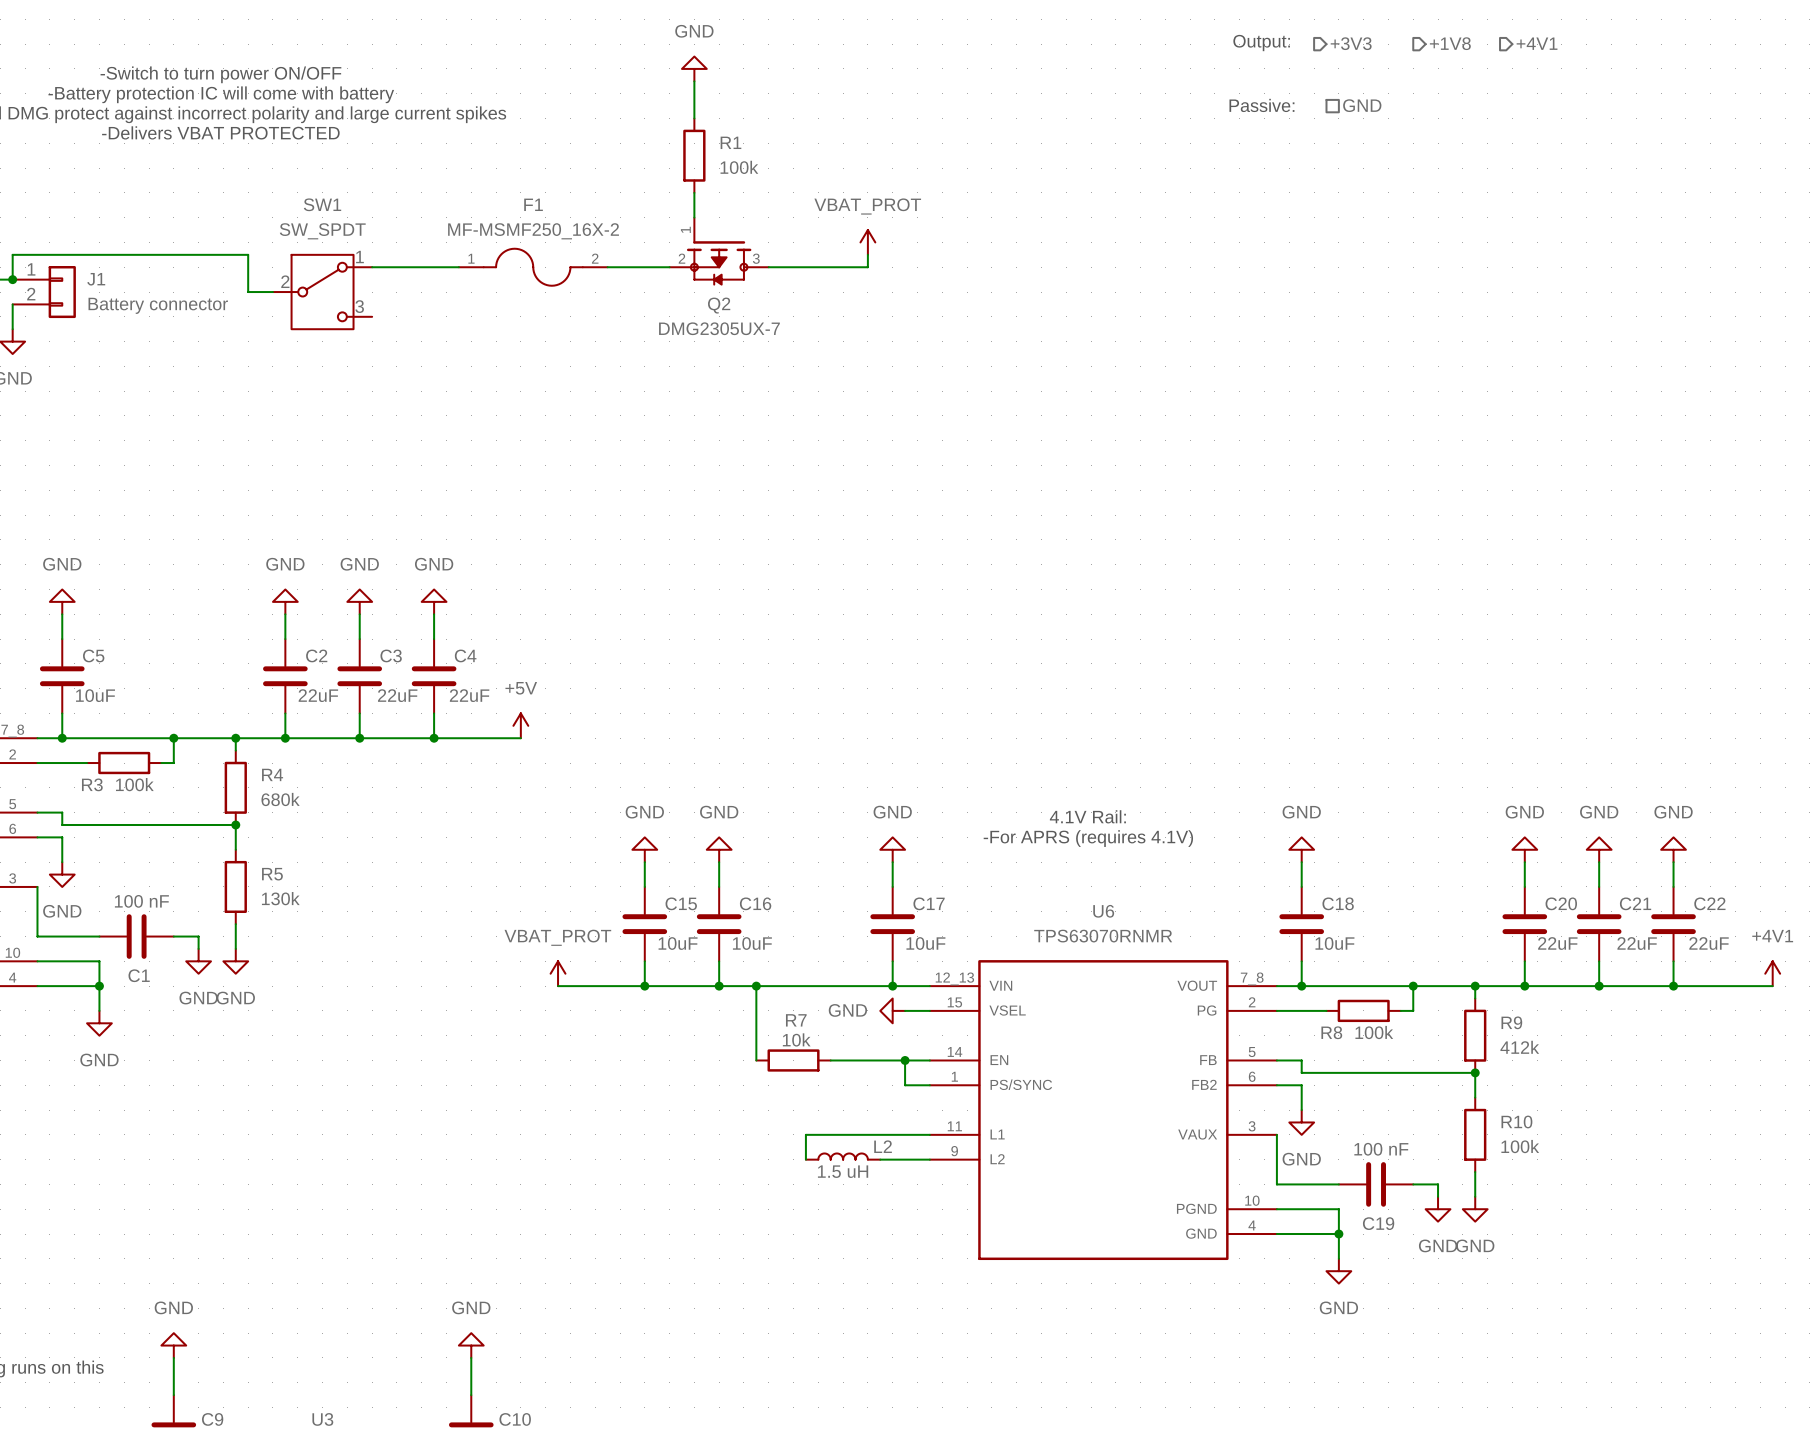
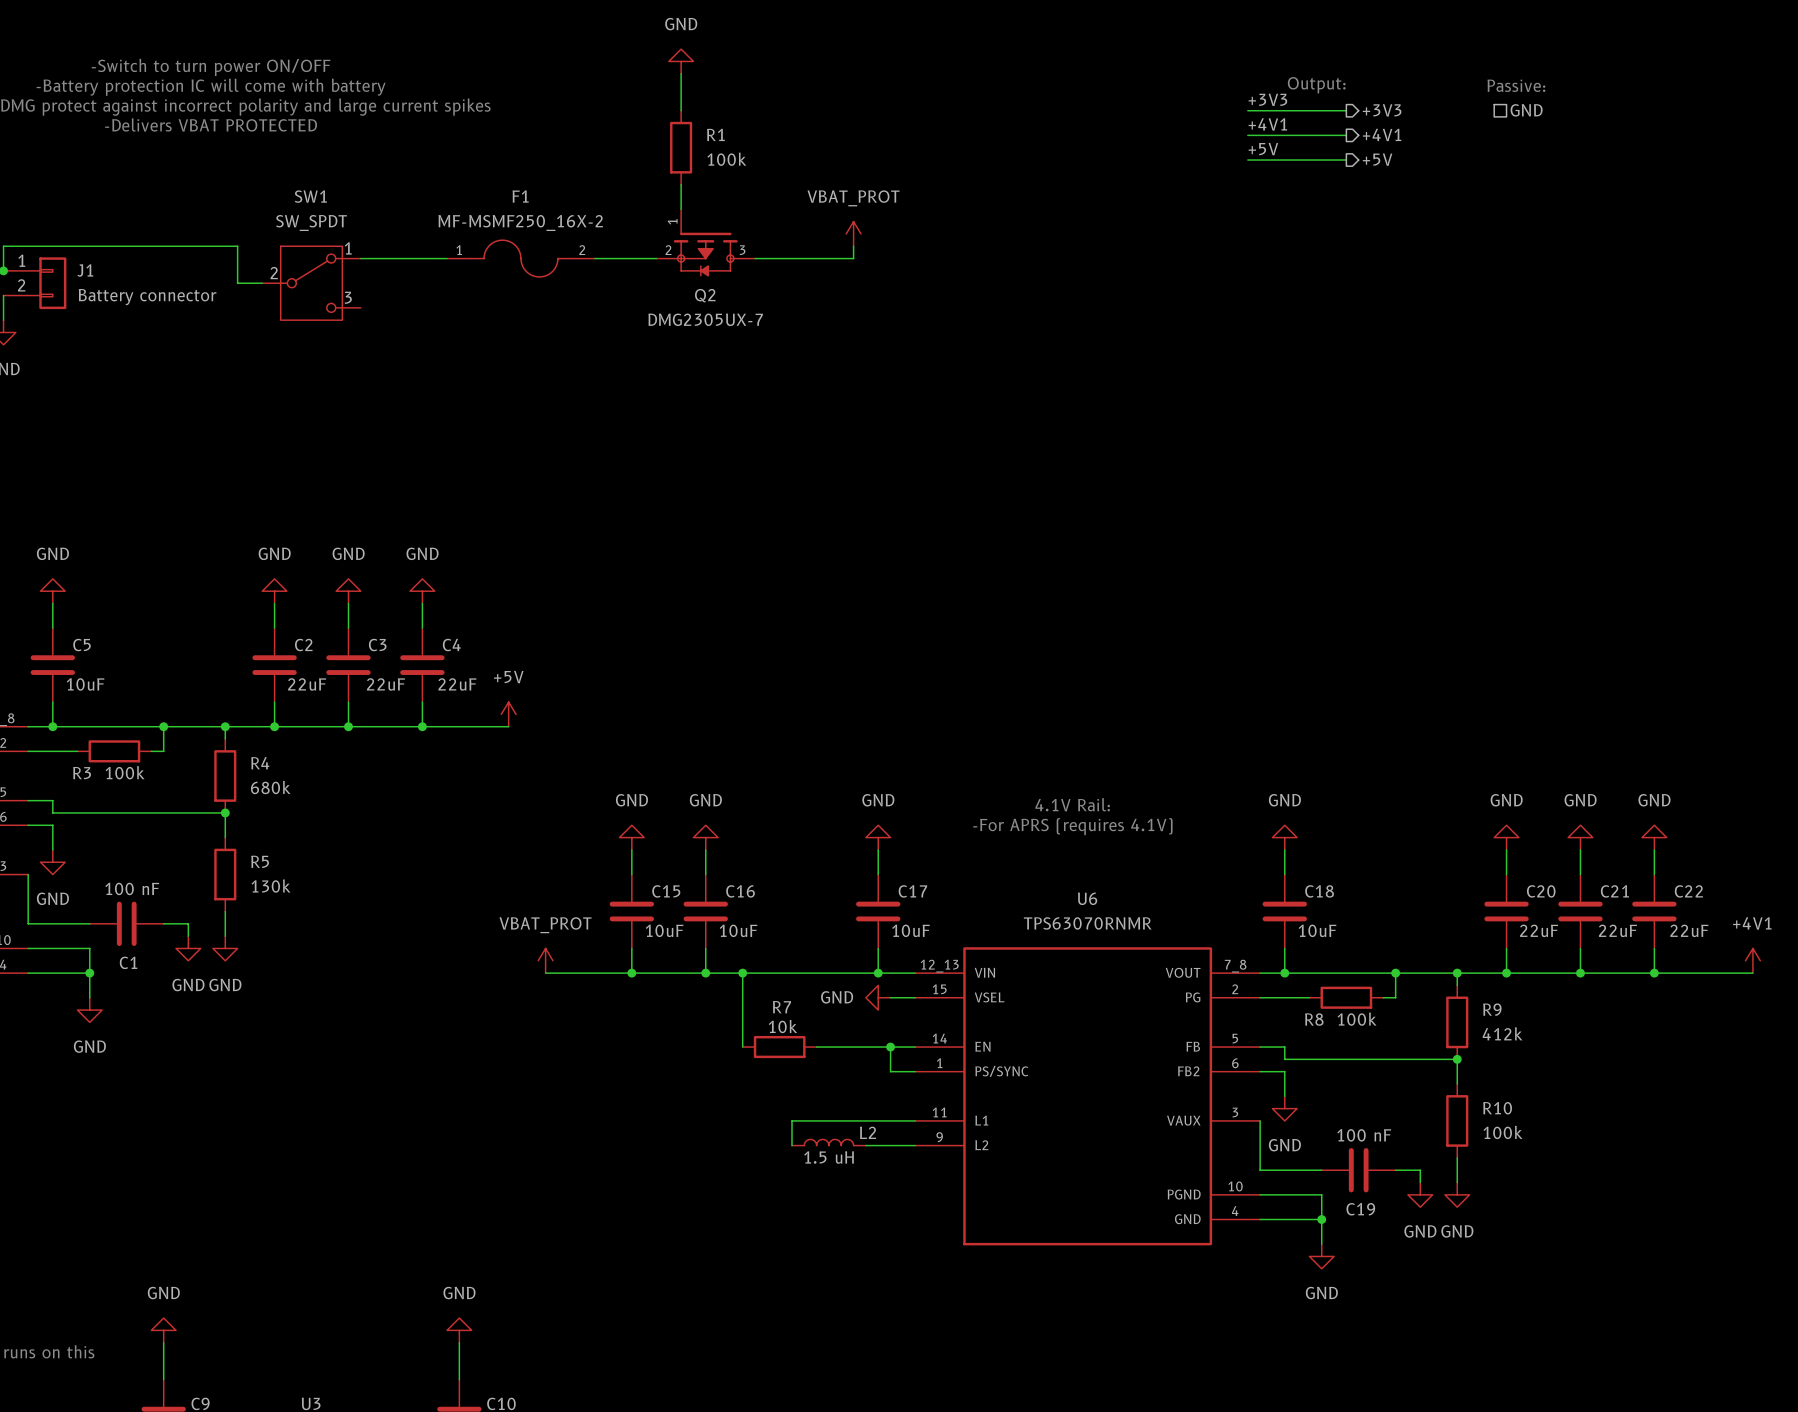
text position: Output: (1261, 43) -> Output: (1316, 85)
hierarchical label position: +3V3 (1351, 43) -> +3V3 (1382, 110)
hierarchical label: +1V8 (1450, 43) -> none
hierarchical label position: +4V1 (1537, 43) -> +4V1 (1382, 134)
text: none -> Passive: (1516, 85)
text: Passive: (1261, 105) -> none
hierarchical label position: GND (1362, 105) -> GND (1526, 110)
label: none -> +3V3 (1267, 99)
wire: none -> (1247, 110) (1346, 110)
label: none -> +4V1 (1267, 124)
wire: none -> (1247, 135) (1346, 135)
label: none -> +5V (1263, 149)
hierarchical label: none -> +5V (1377, 159)
wire: none -> (1247, 160) (1346, 160)

